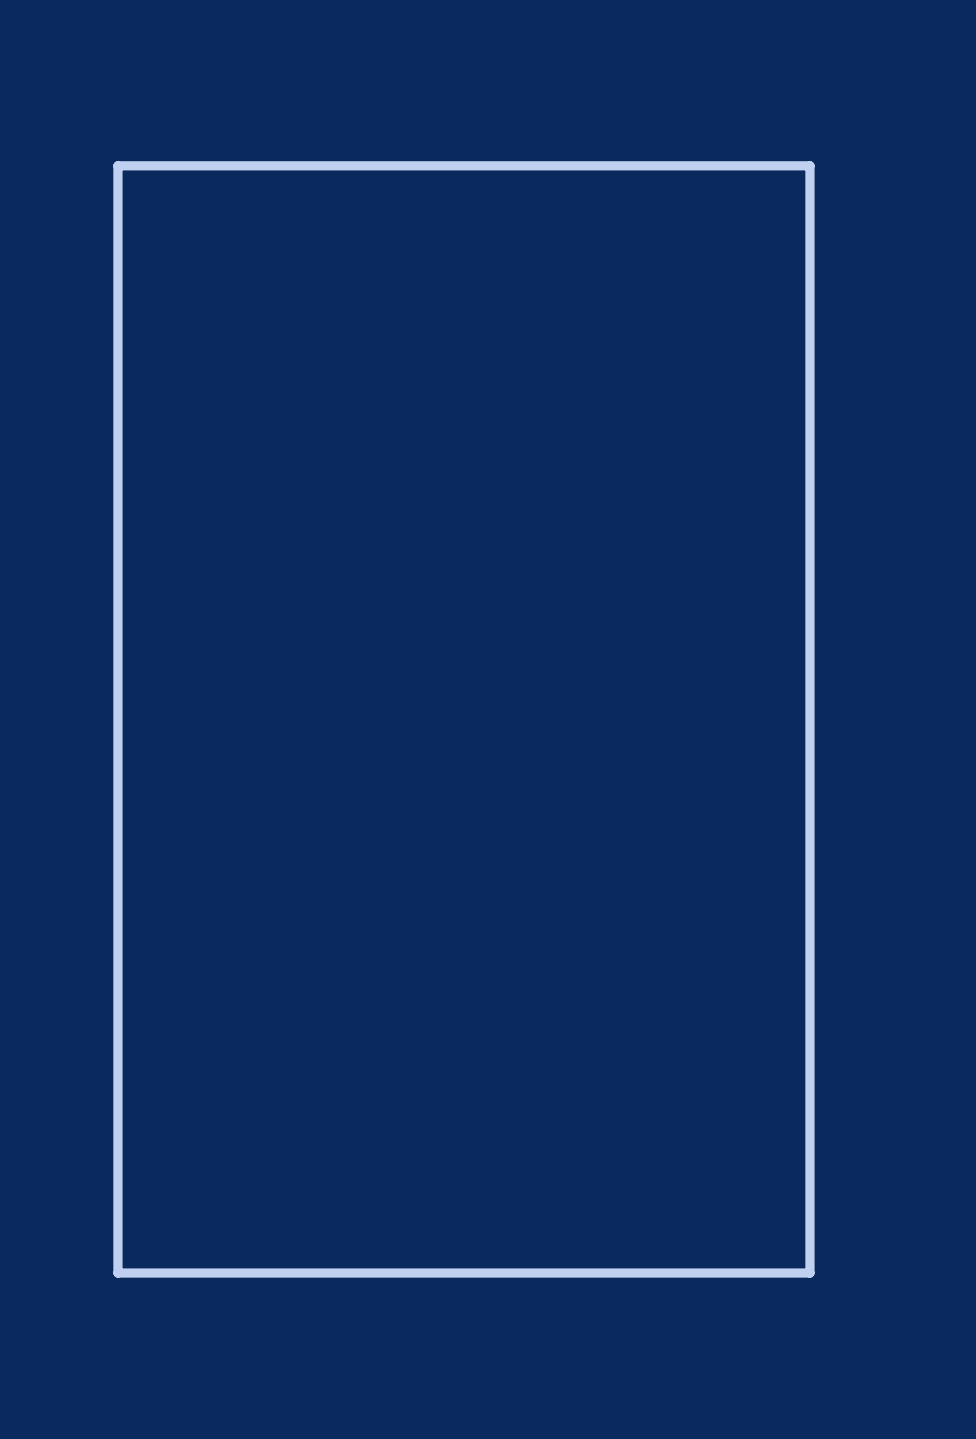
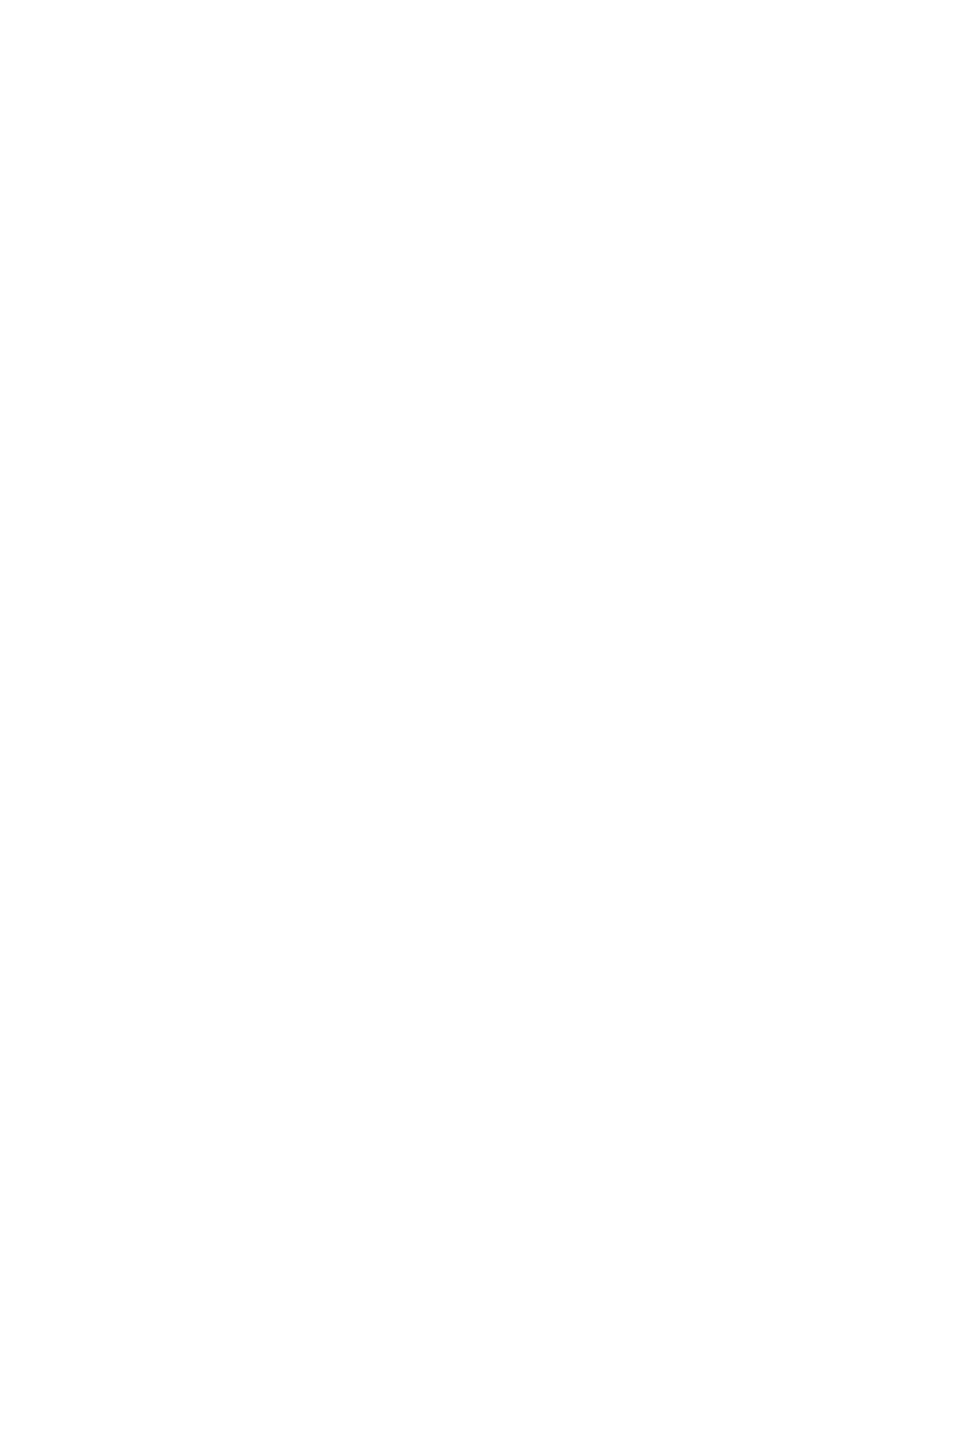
board edge: (809, 165) (809, 1273) (117, 1273) (117, 165) (809, 165) -> none

